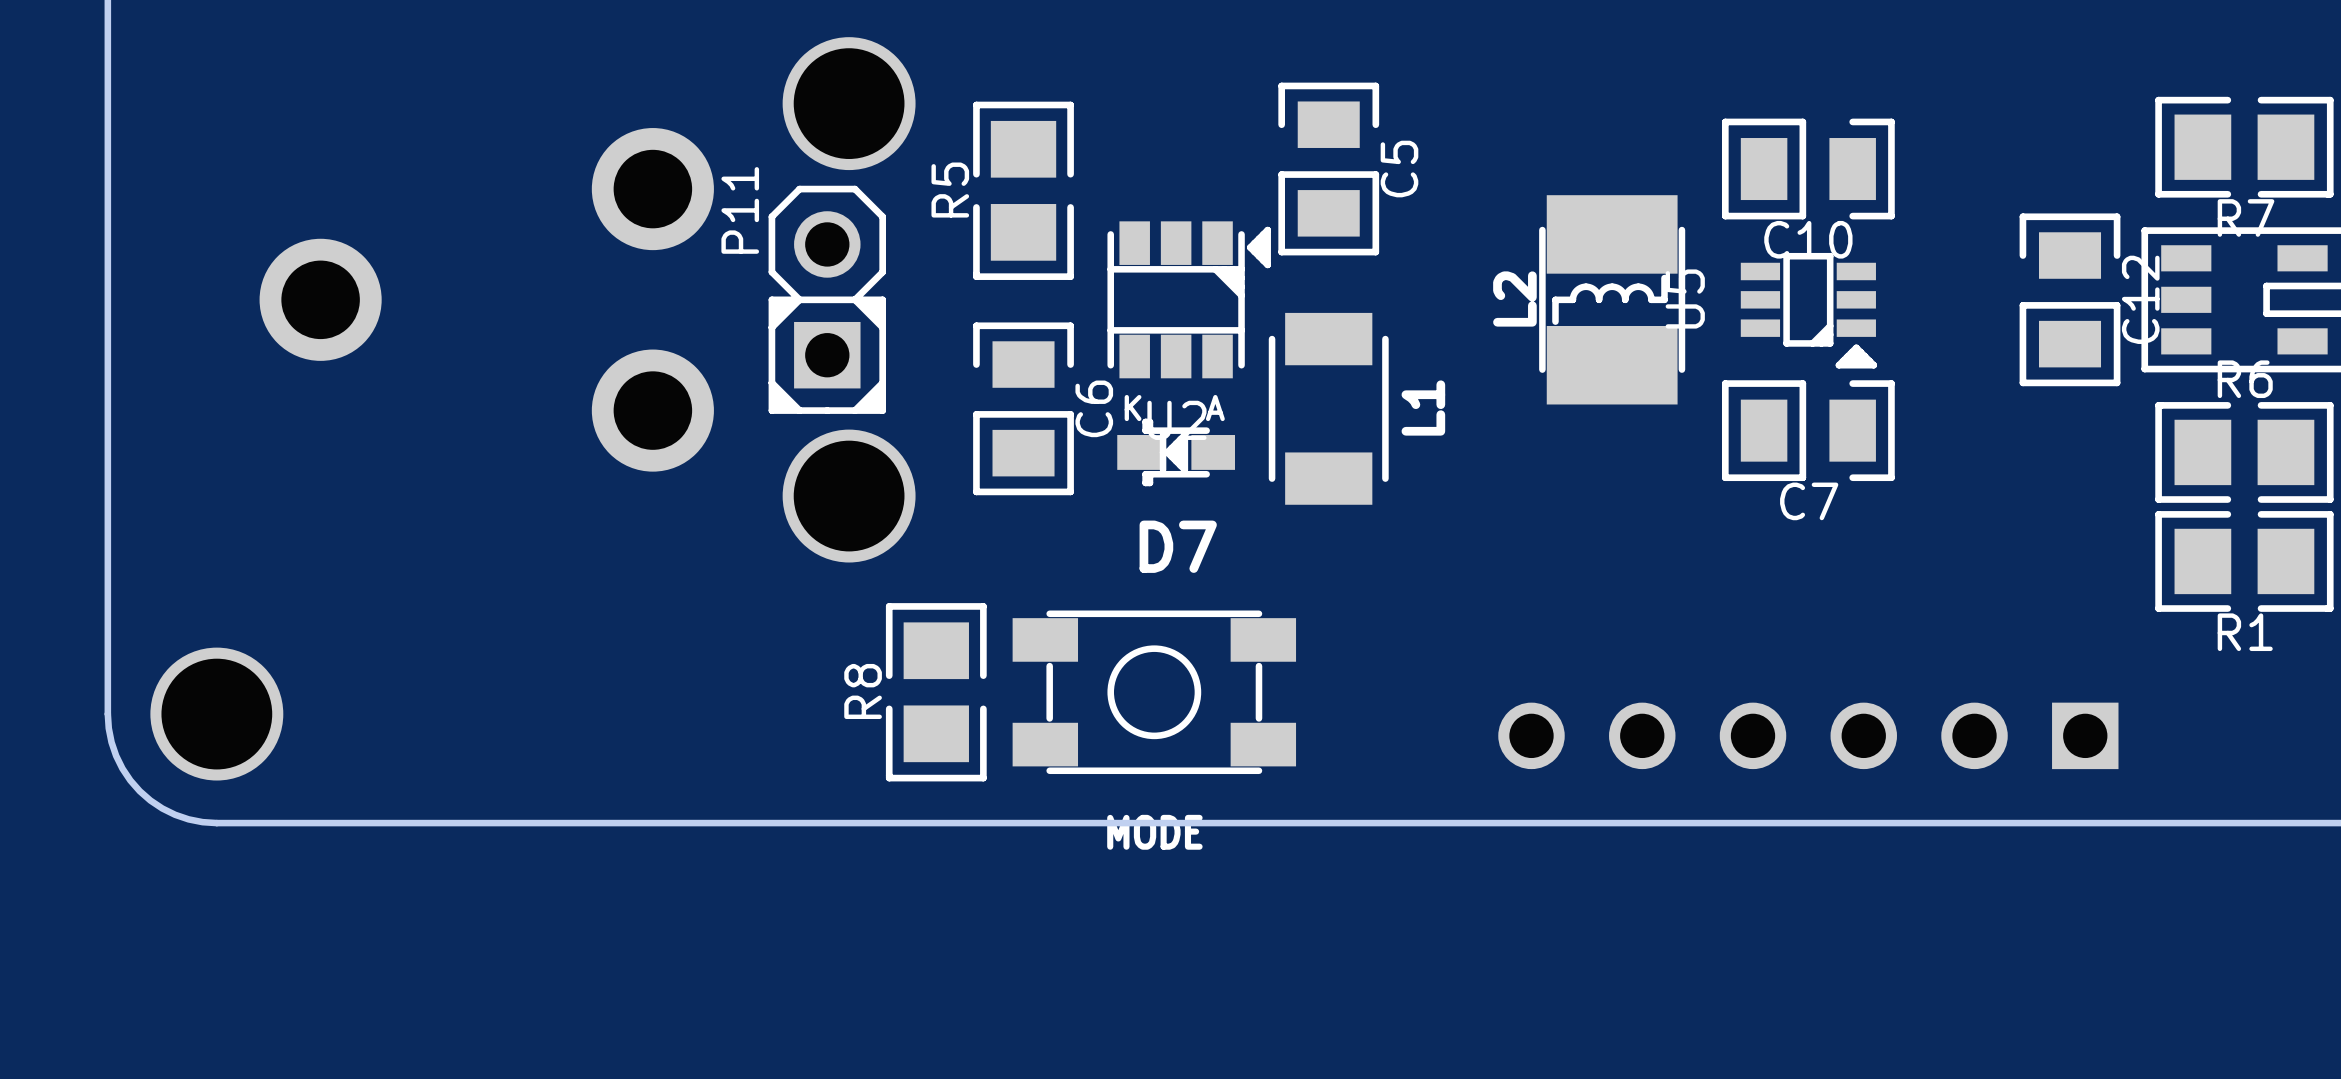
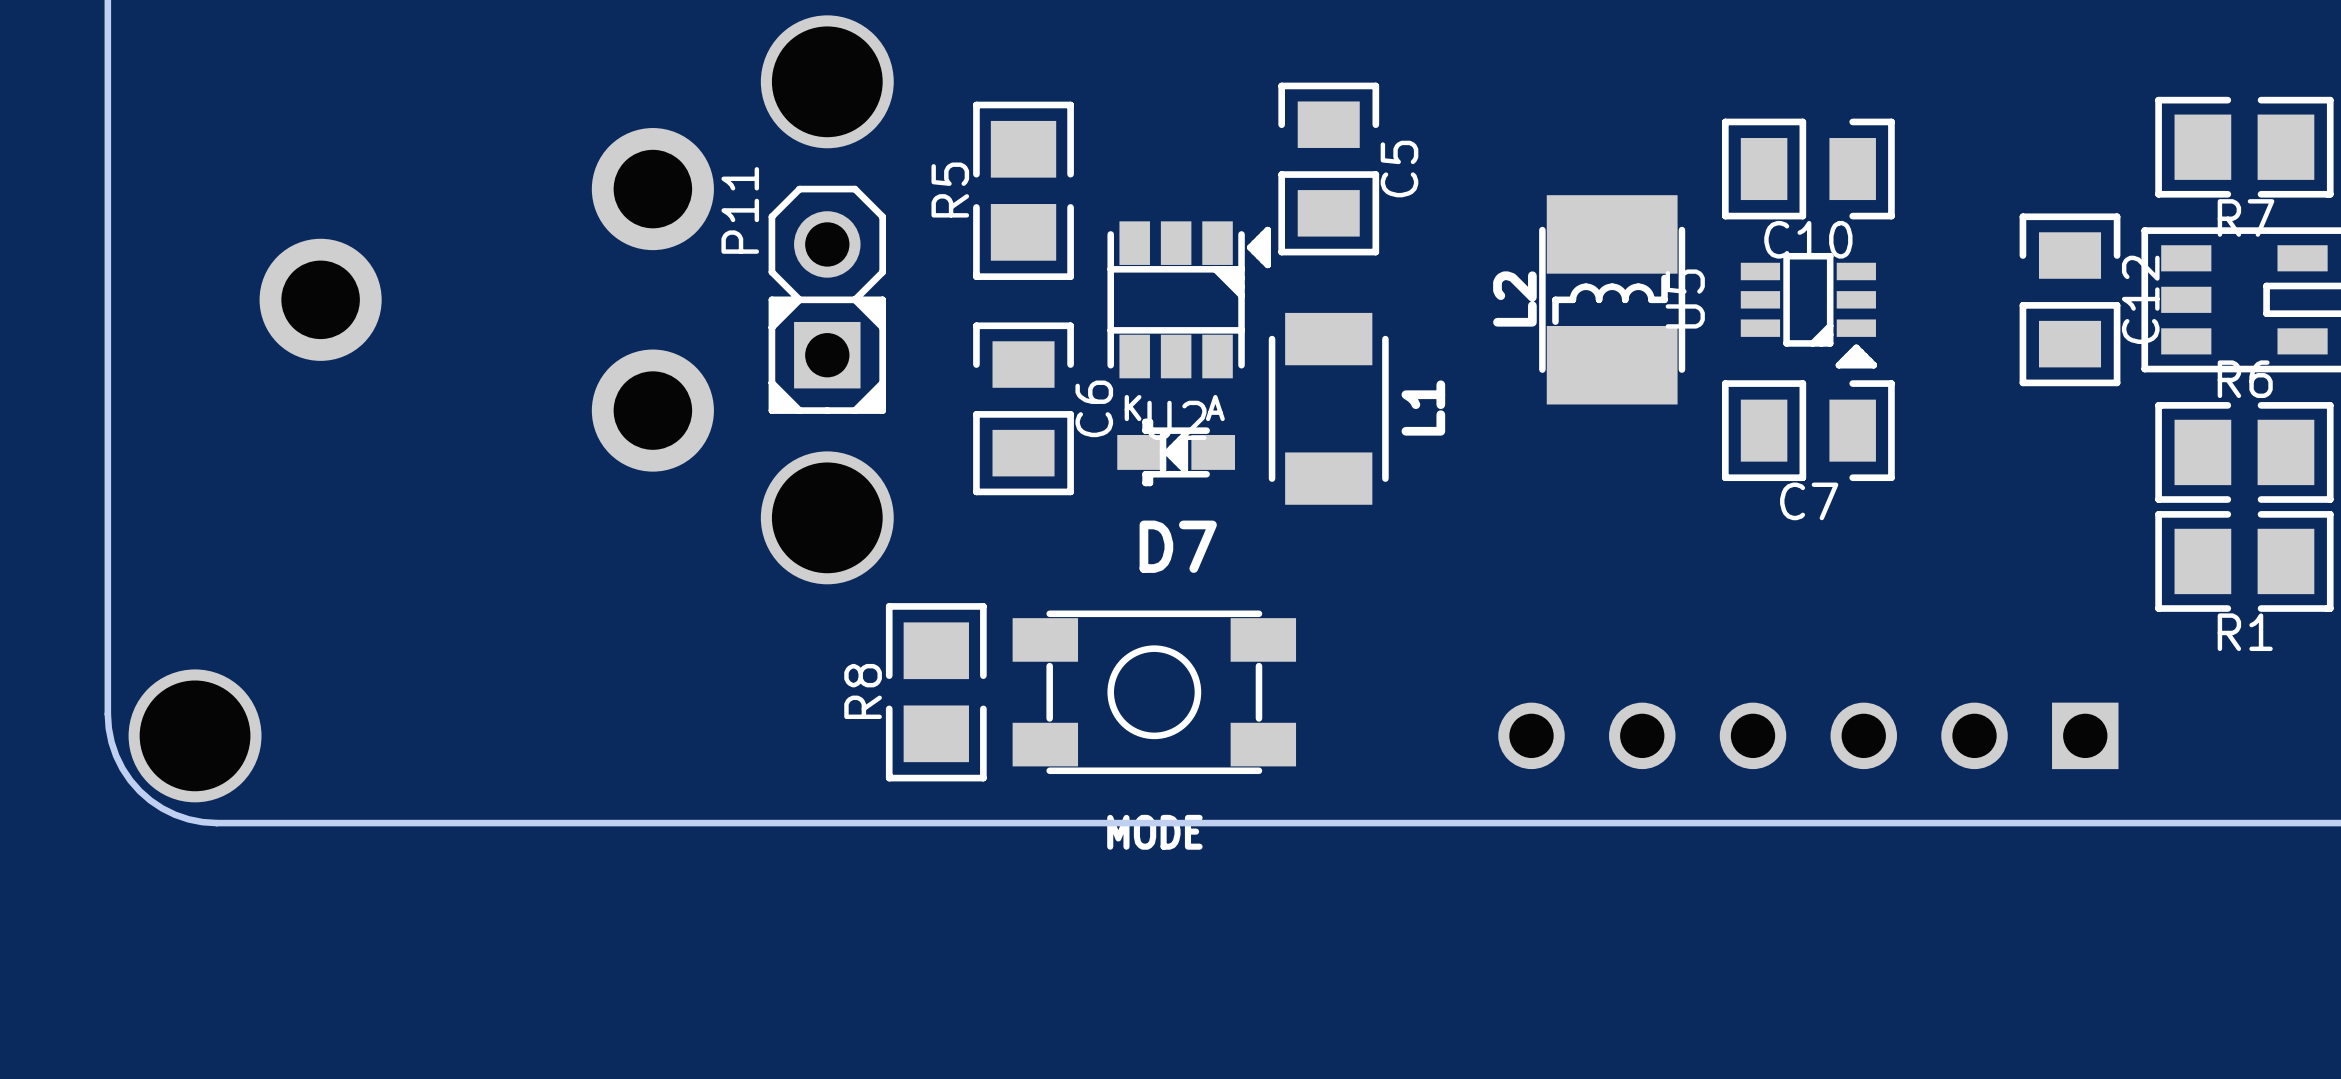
part position: (849, 103) -> (827, 81)
part position: (849, 496) -> (827, 517)
part position: (216, 714) -> (195, 735)

